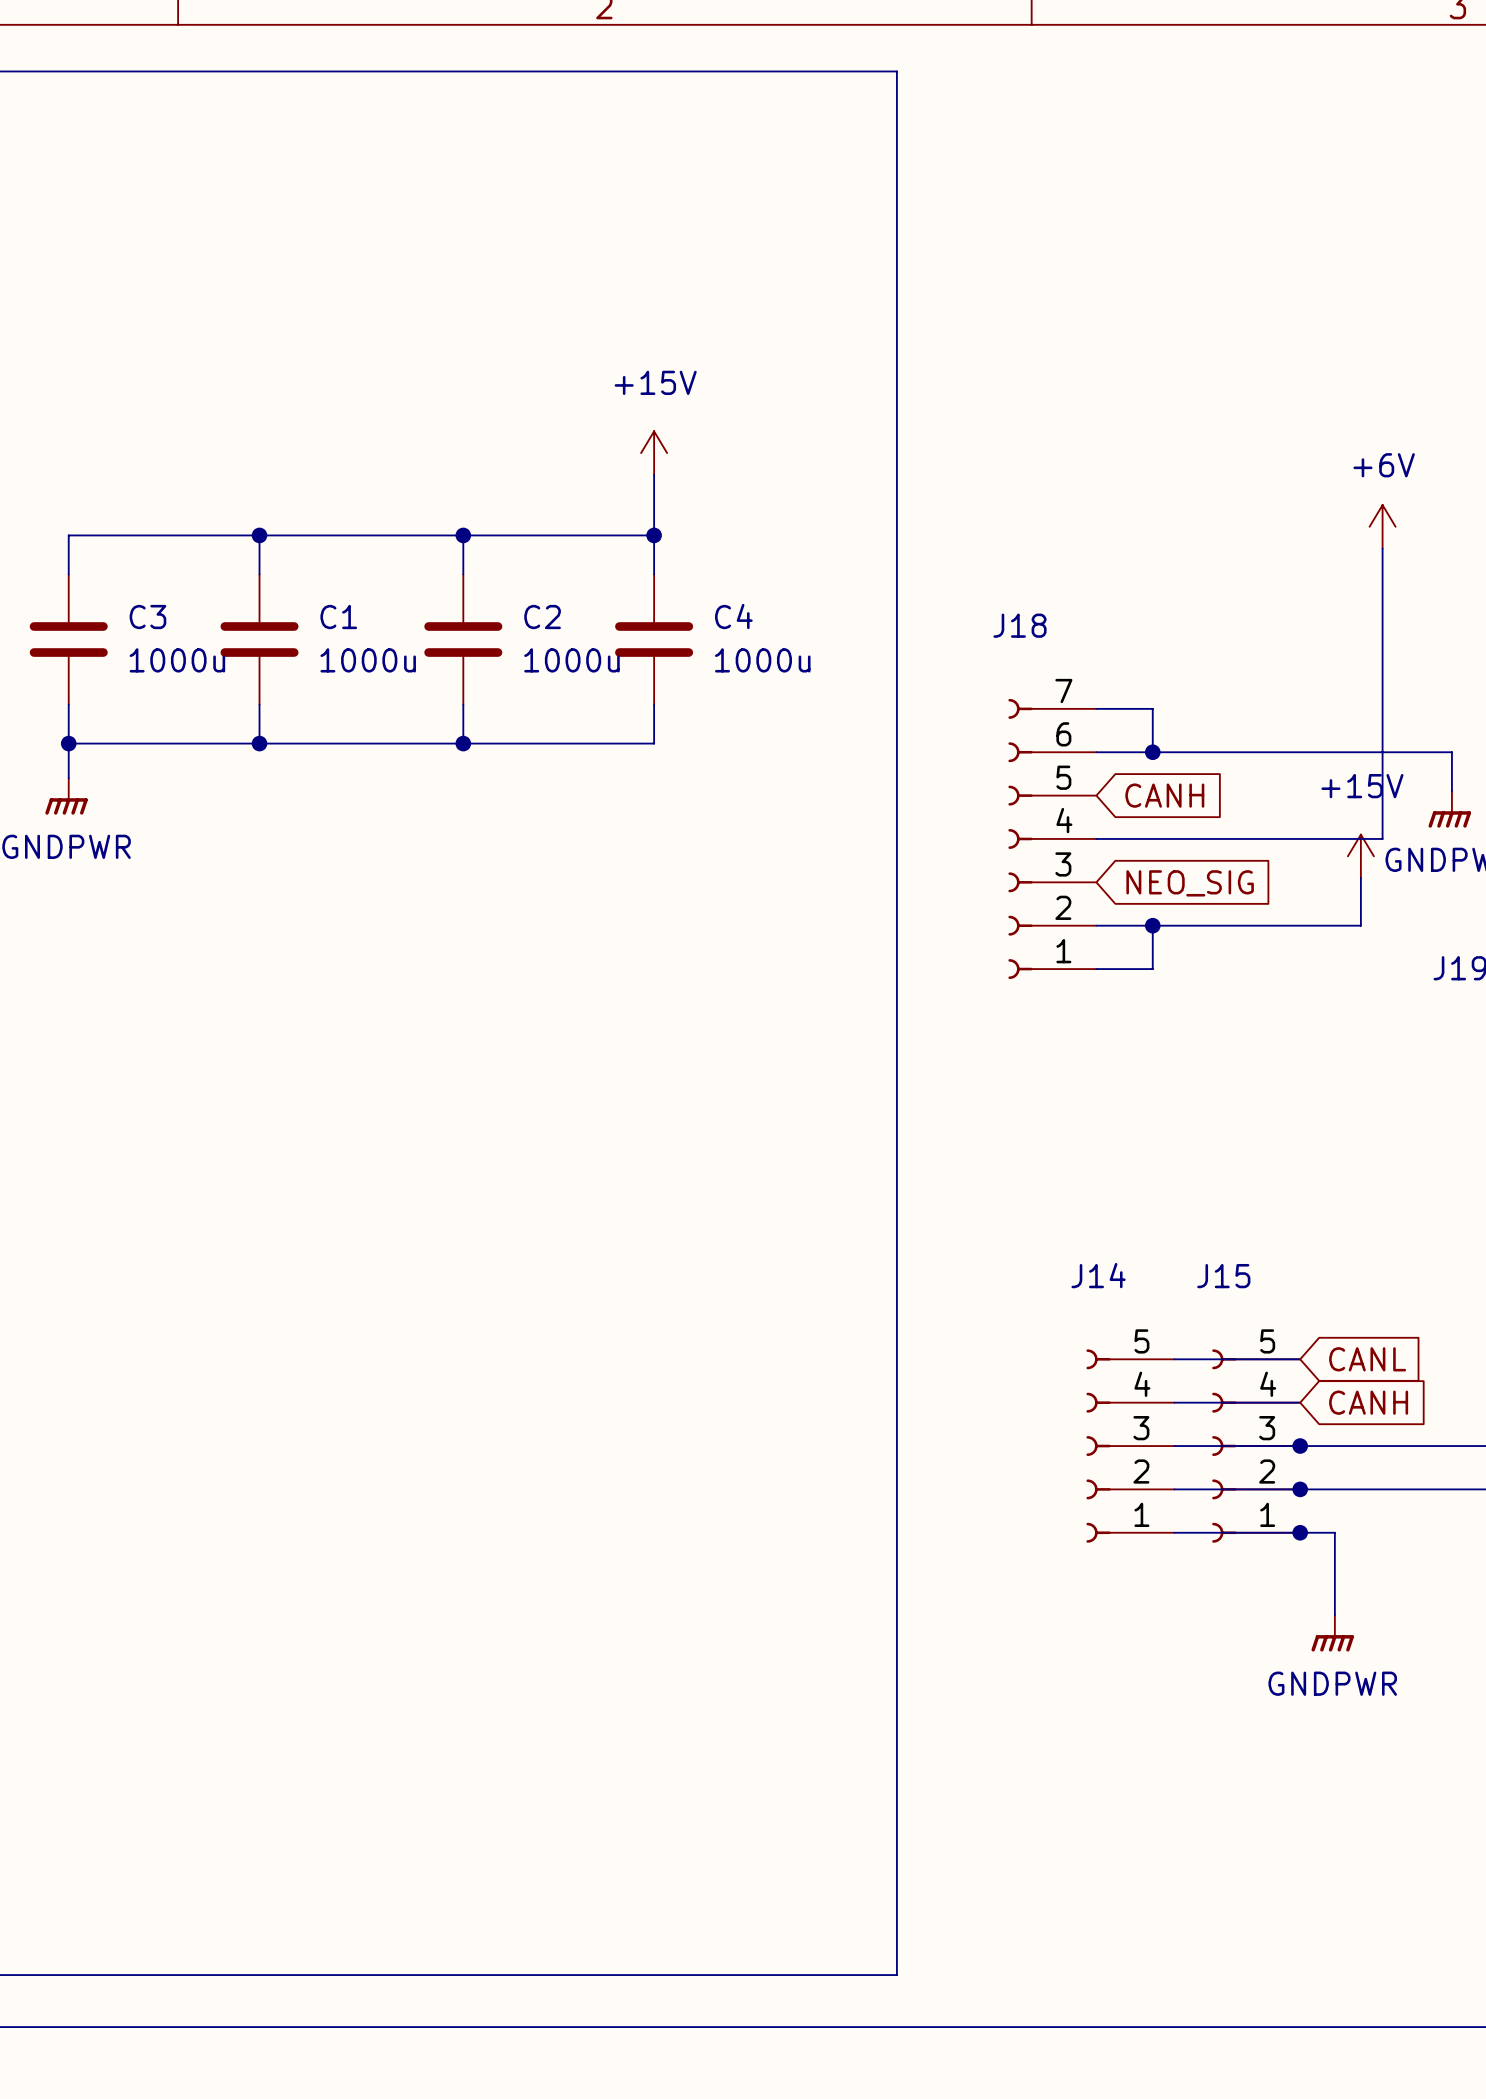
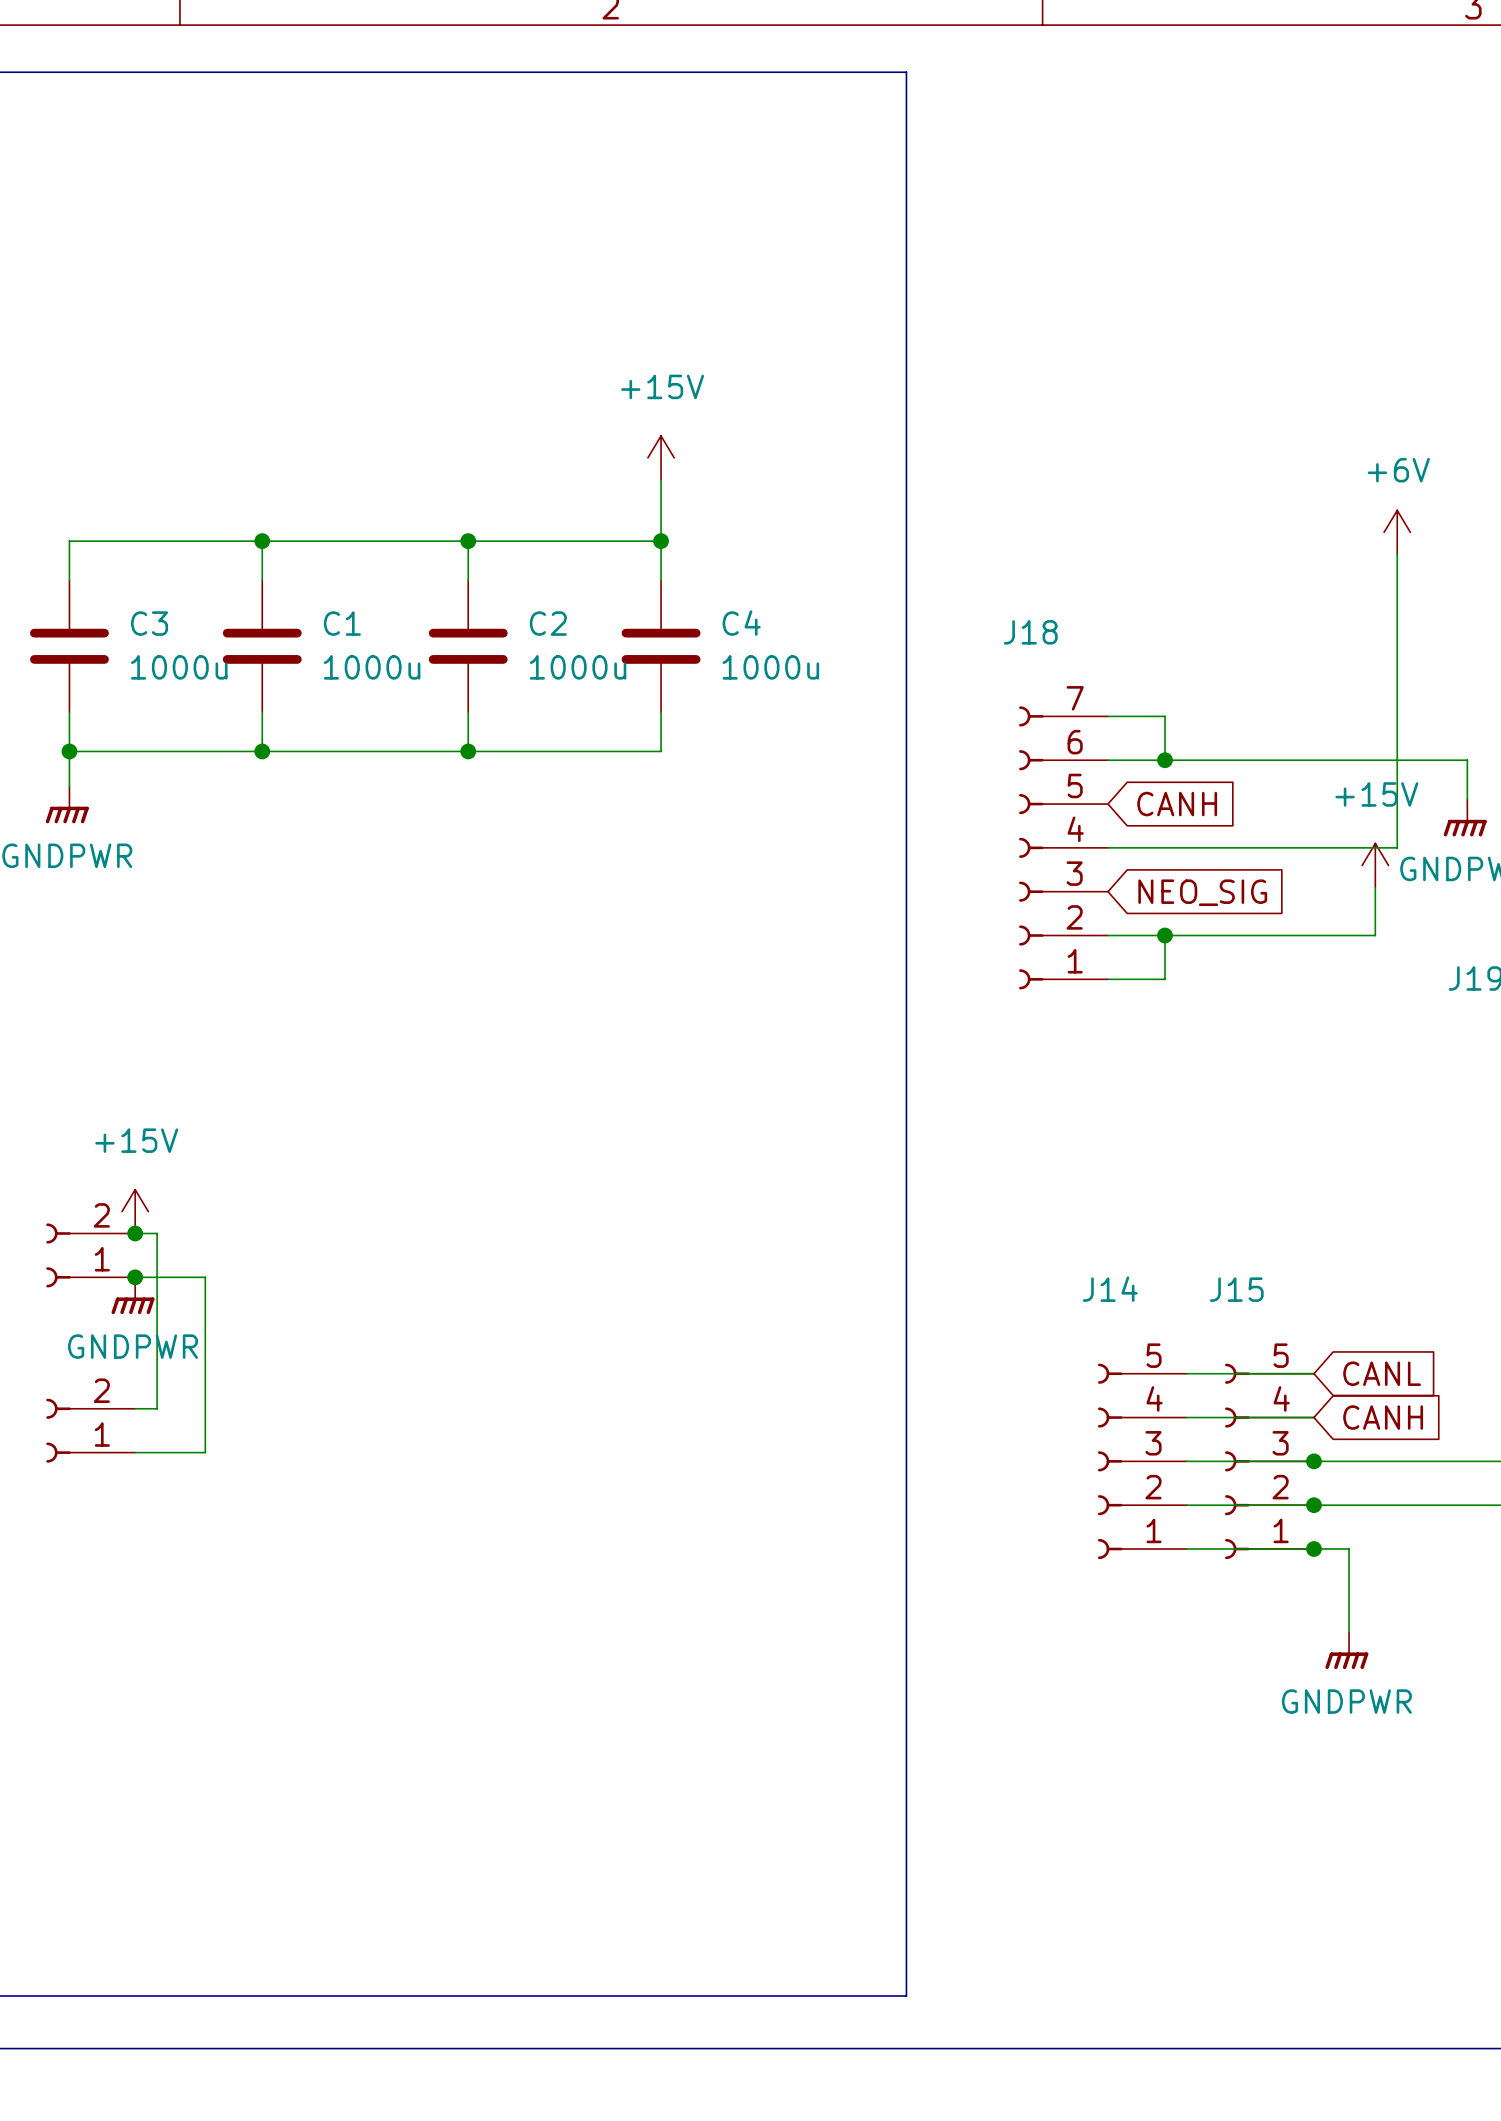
power symbol: none -> +15V (135, 1211)
wire: none -> (135, 1233) (157, 1233) (157, 1408) (135, 1408)
junction: none -> (135, 1233)
part: none -> (90, 1255)
wire: none -> (135, 1277) (205, 1277) (205, 1452) (135, 1452)
junction: none -> (135, 1277)
power symbol: none -> GNDPWR (132, 1295)
part: none -> (90, 1430)

